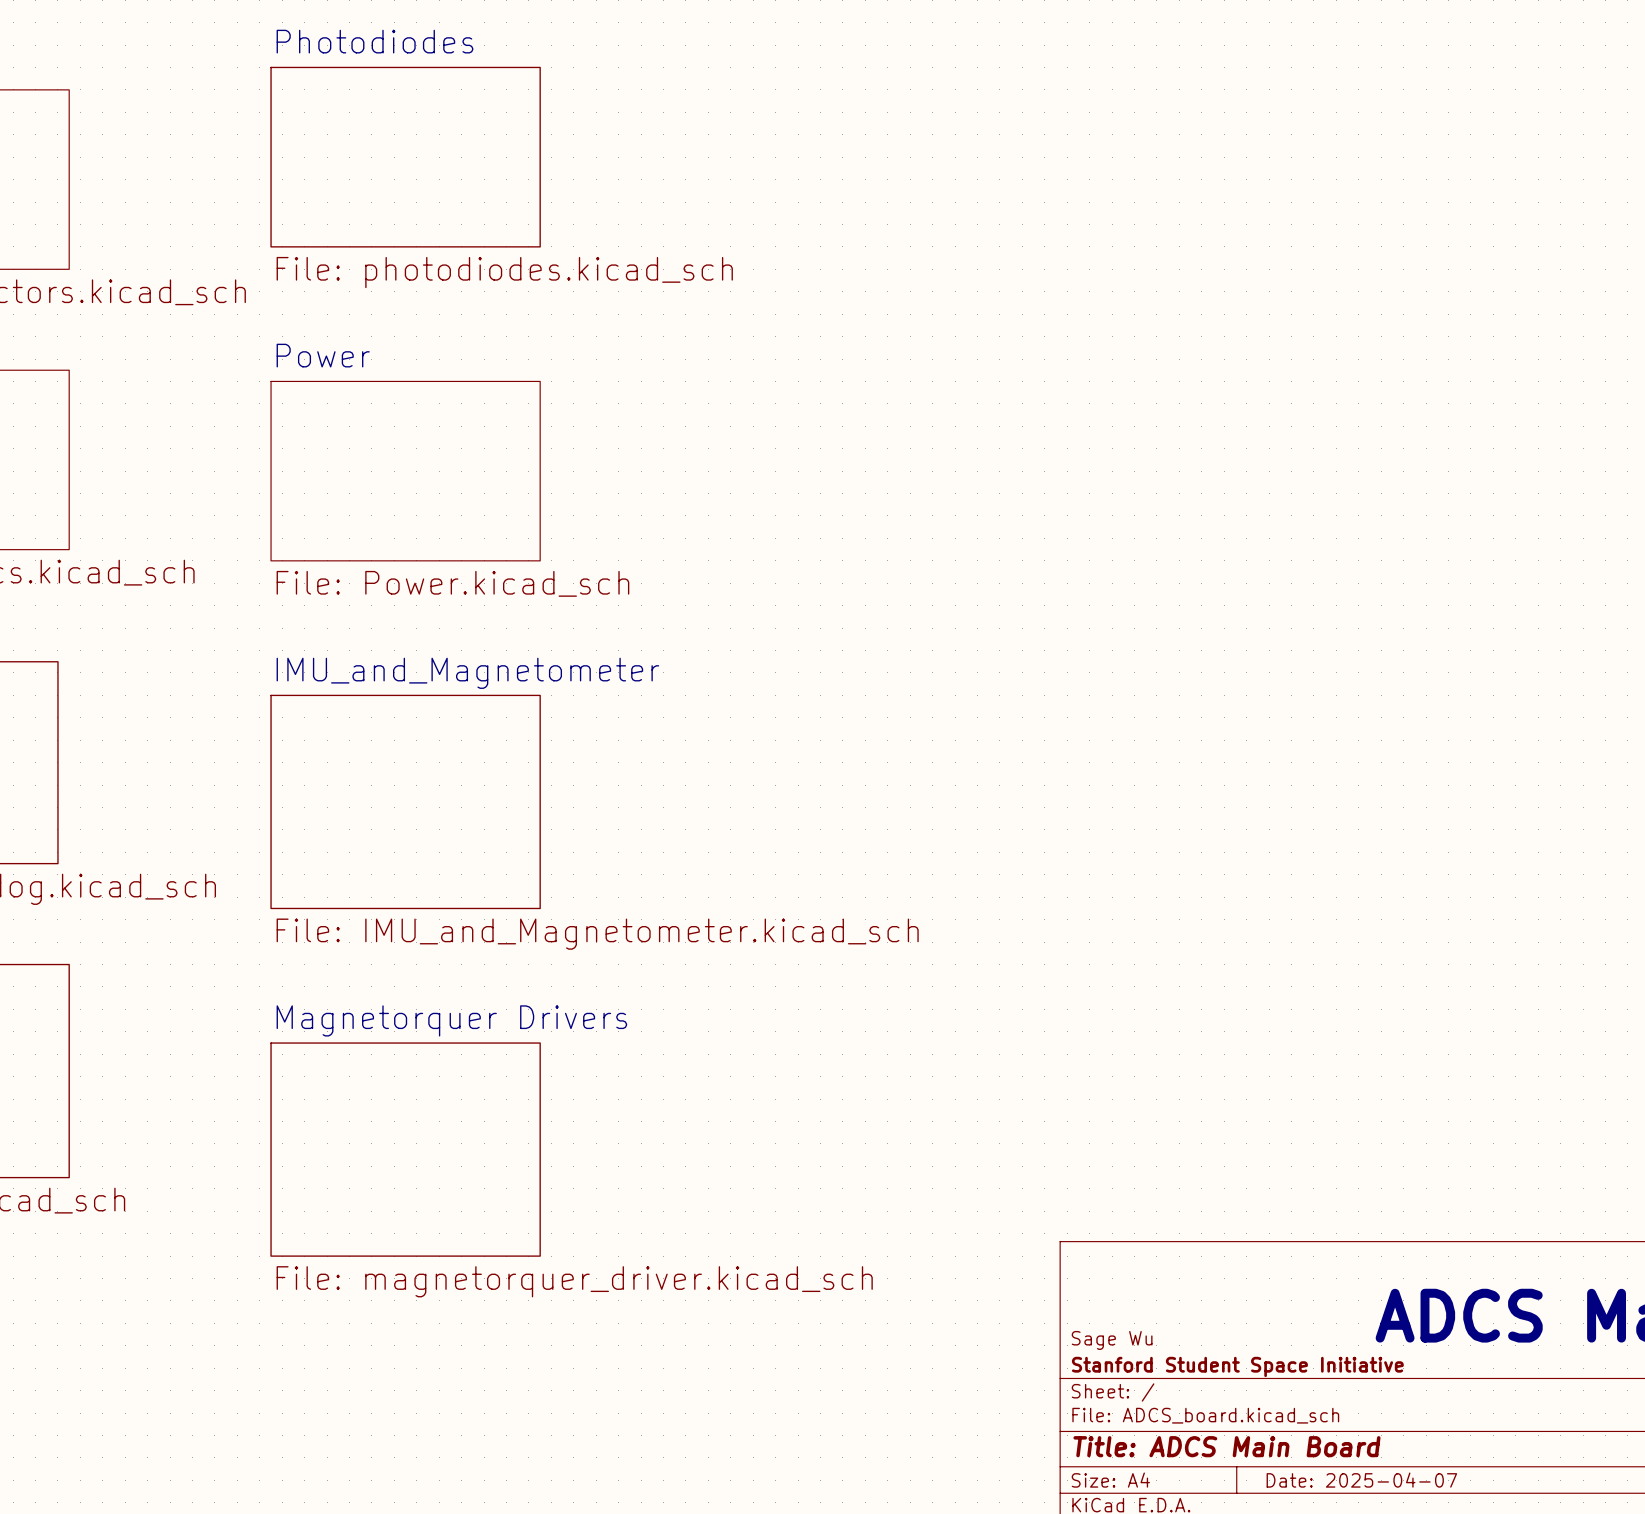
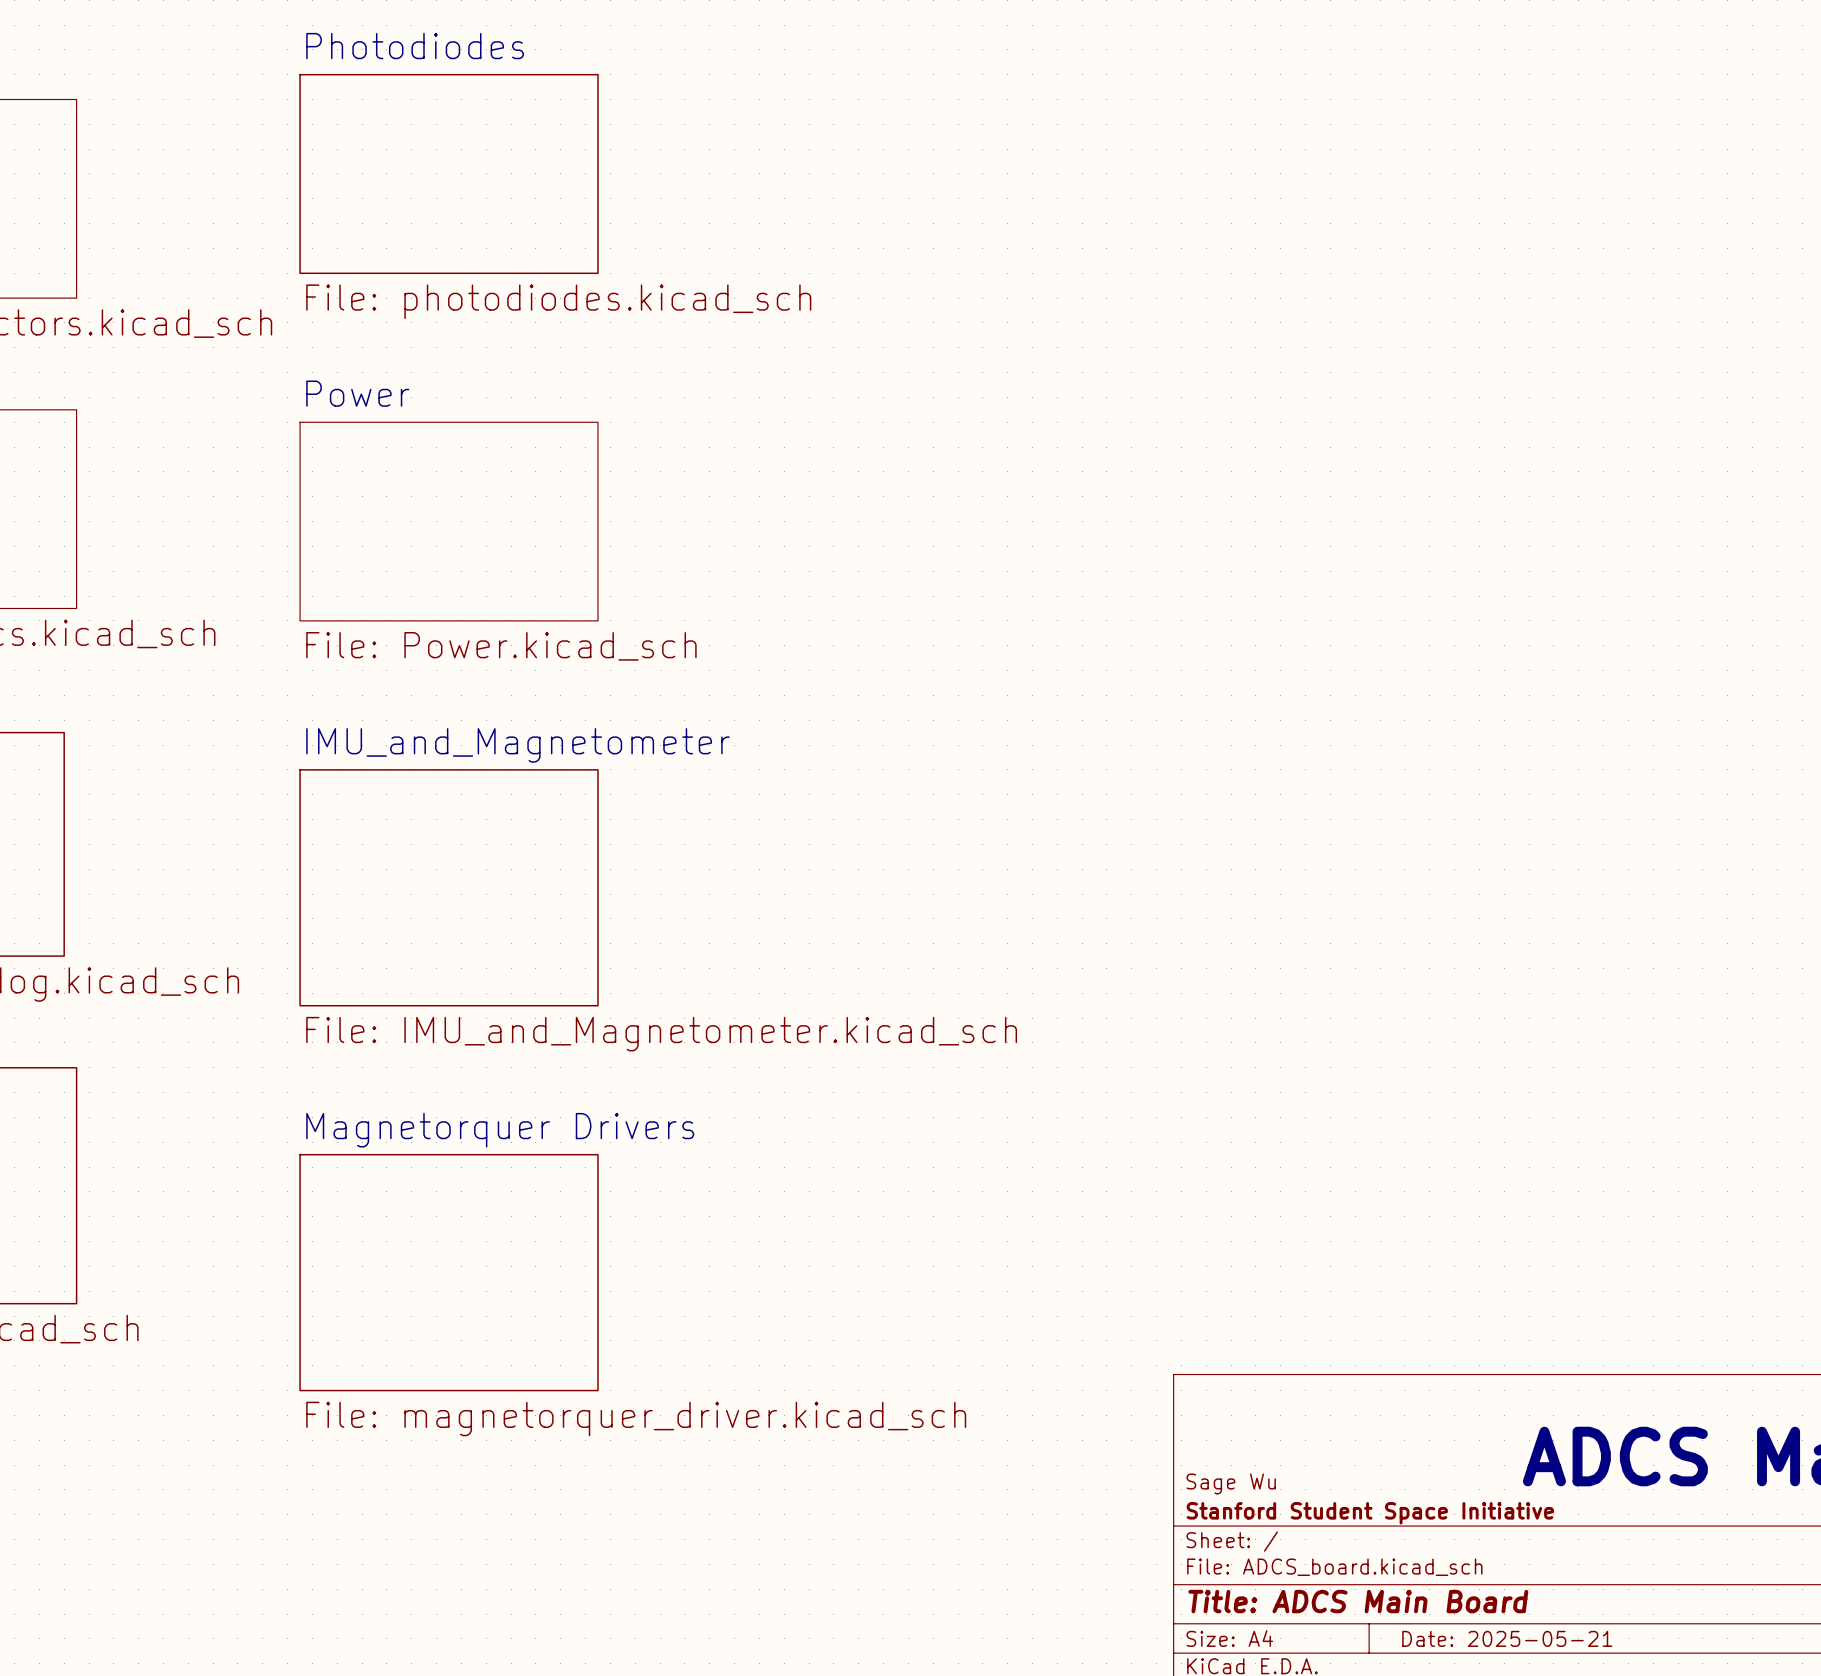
title block: Date: 2025-04-07 (1361, 1480) -> Date: 2025-05-21 (1507, 1638)

